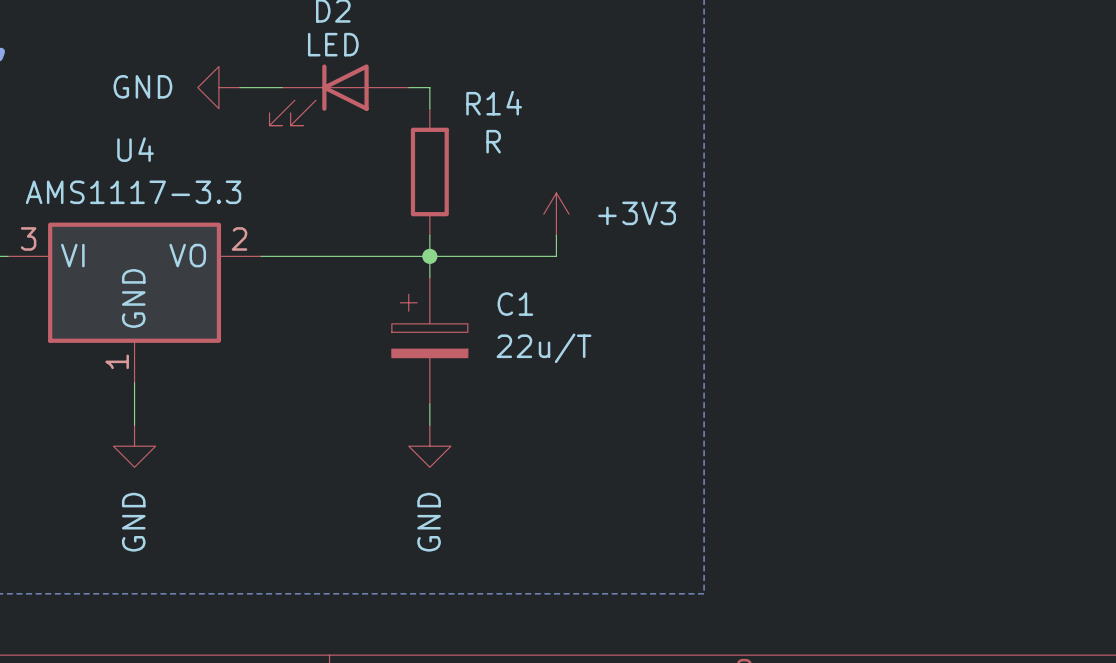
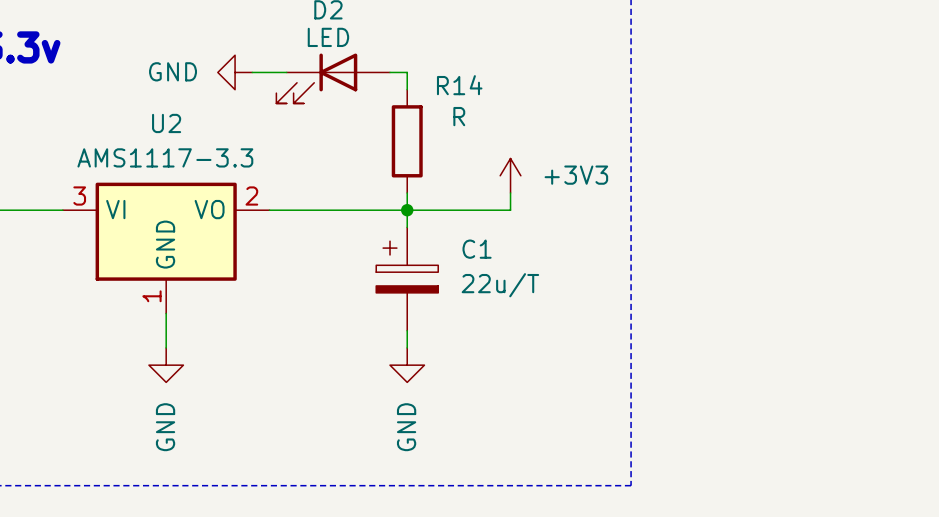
U4 name: U4 (135, 149) -> U2 (166, 123)

